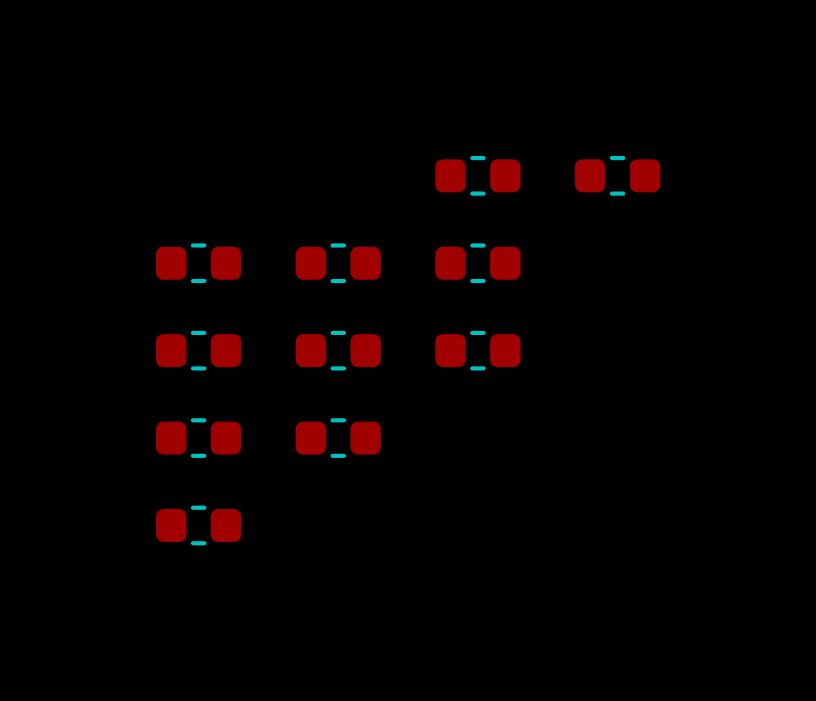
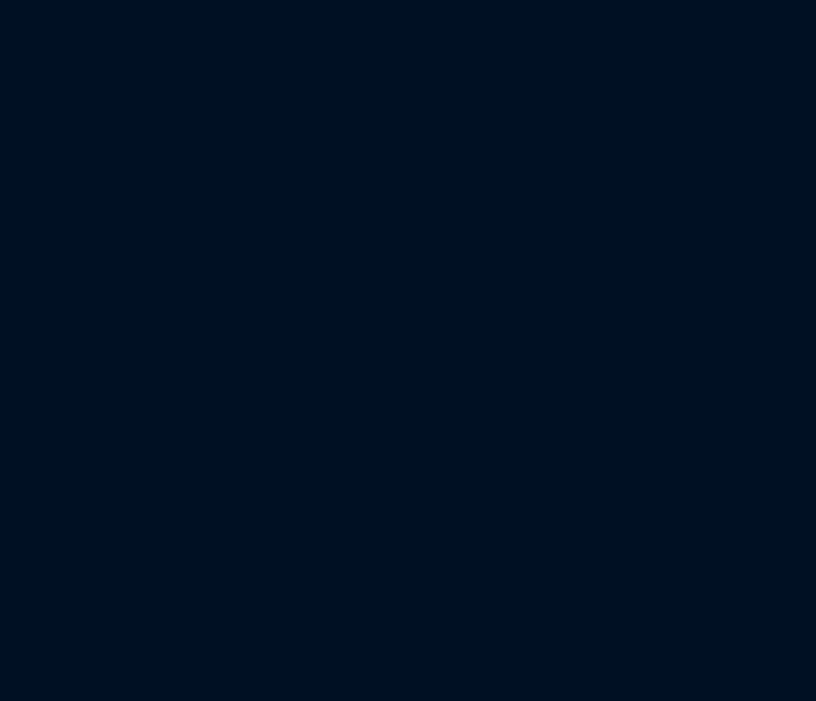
part: (477, 175) -> none
part: (617, 175) -> none
part: (198, 263) -> none
part: (338, 263) -> none
part: (477, 263) -> none
part: (198, 350) -> none
part: (338, 350) -> none
part: (477, 350) -> none
part: (198, 438) -> none
part: (338, 438) -> none
part: (198, 525) -> none

